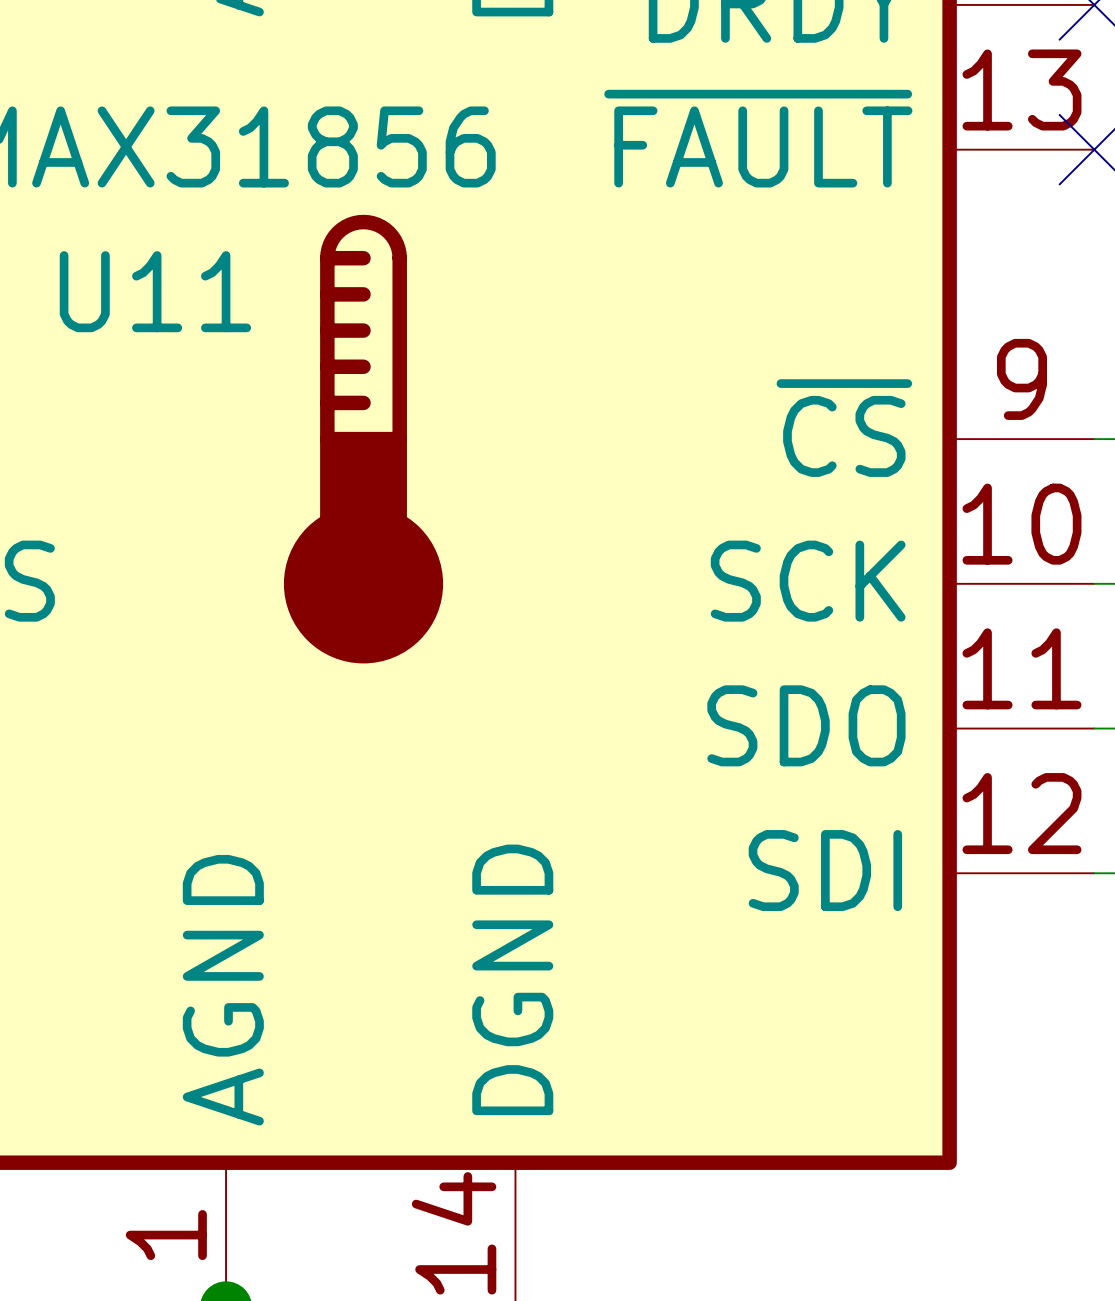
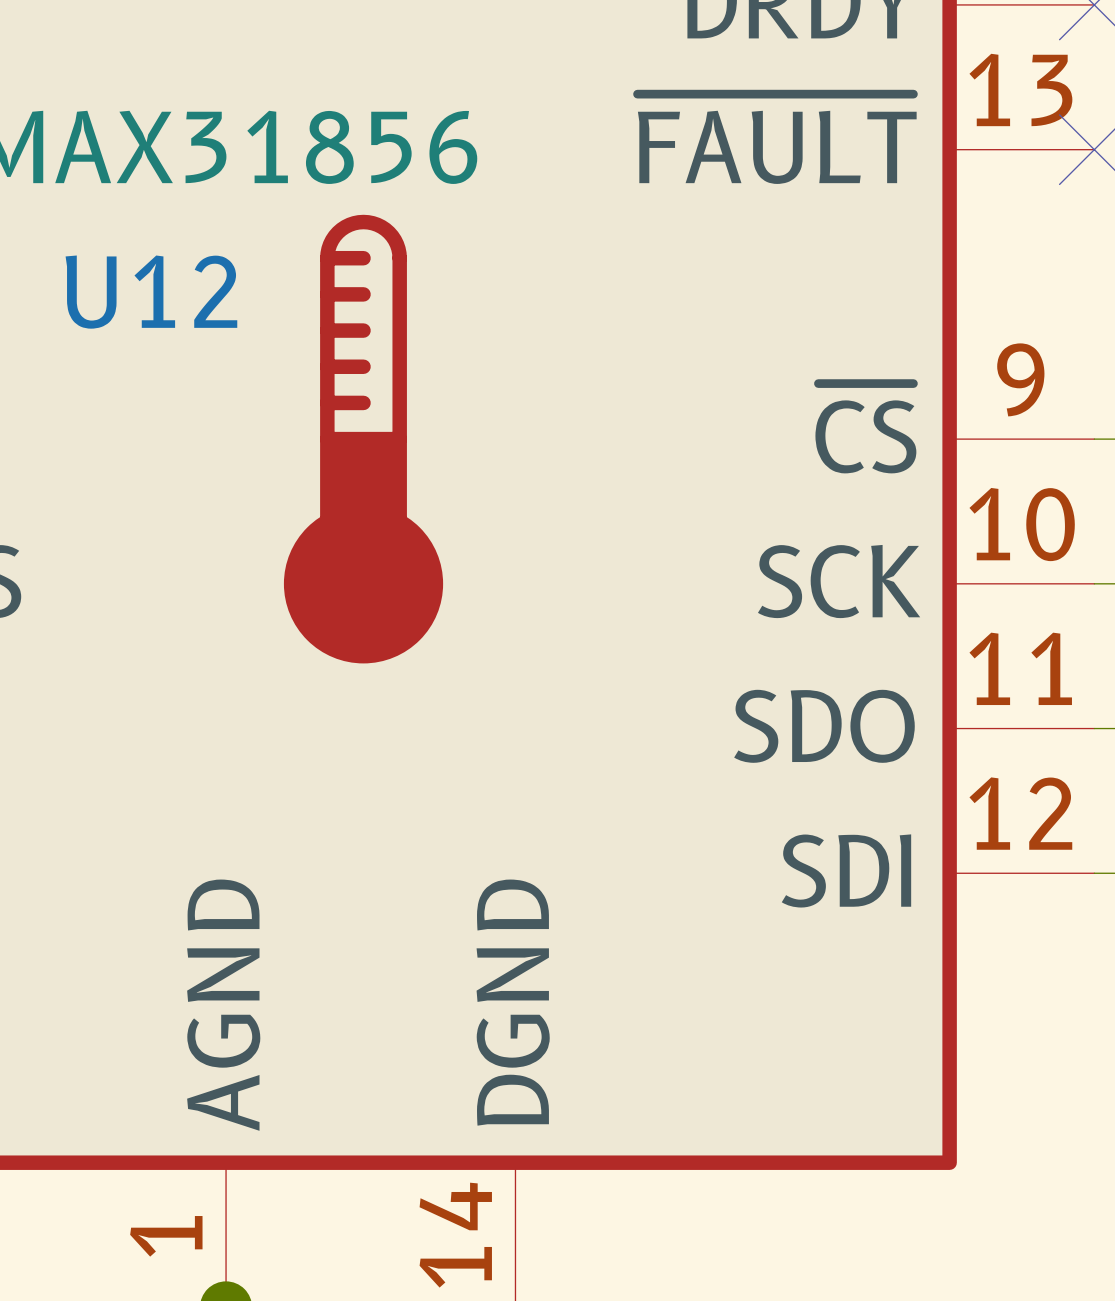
U11 name: U11 (155, 291) -> U12 (151, 292)

